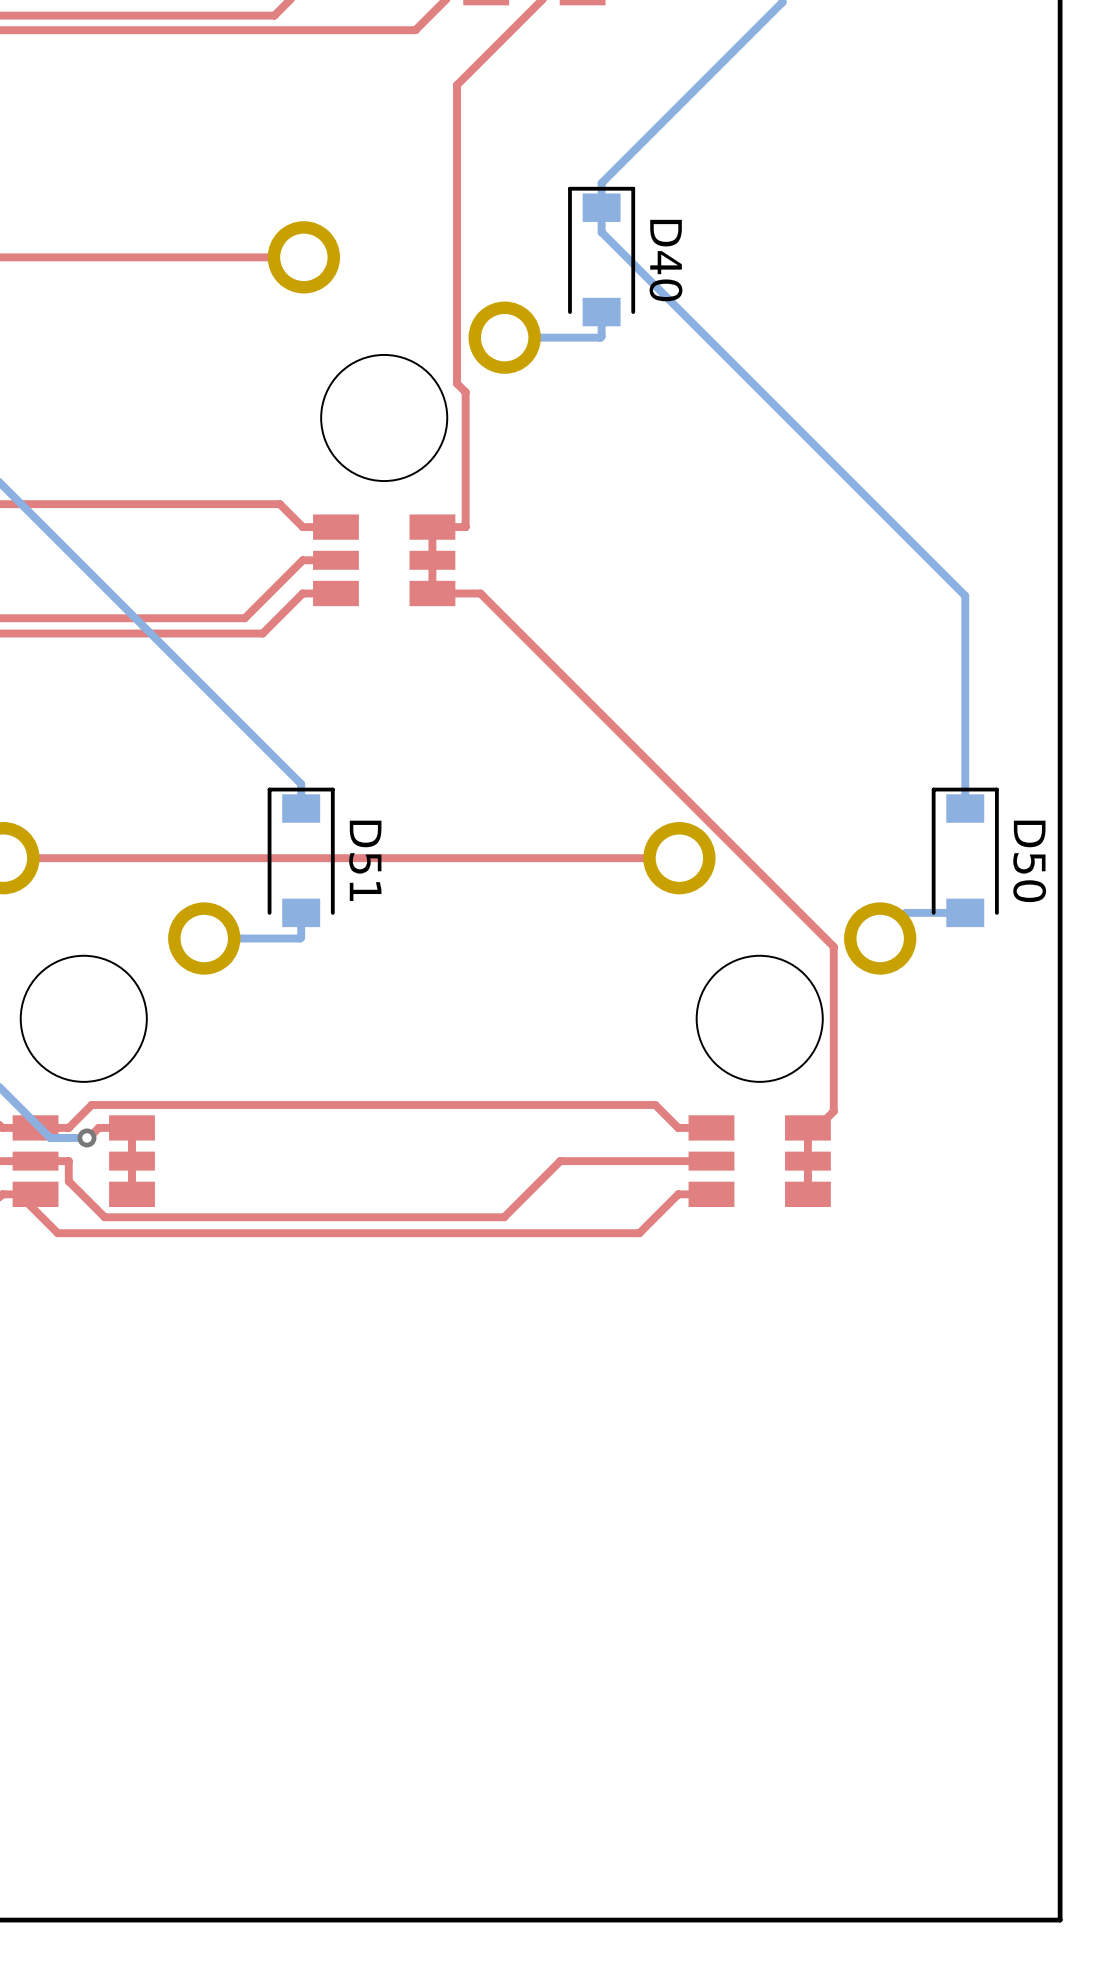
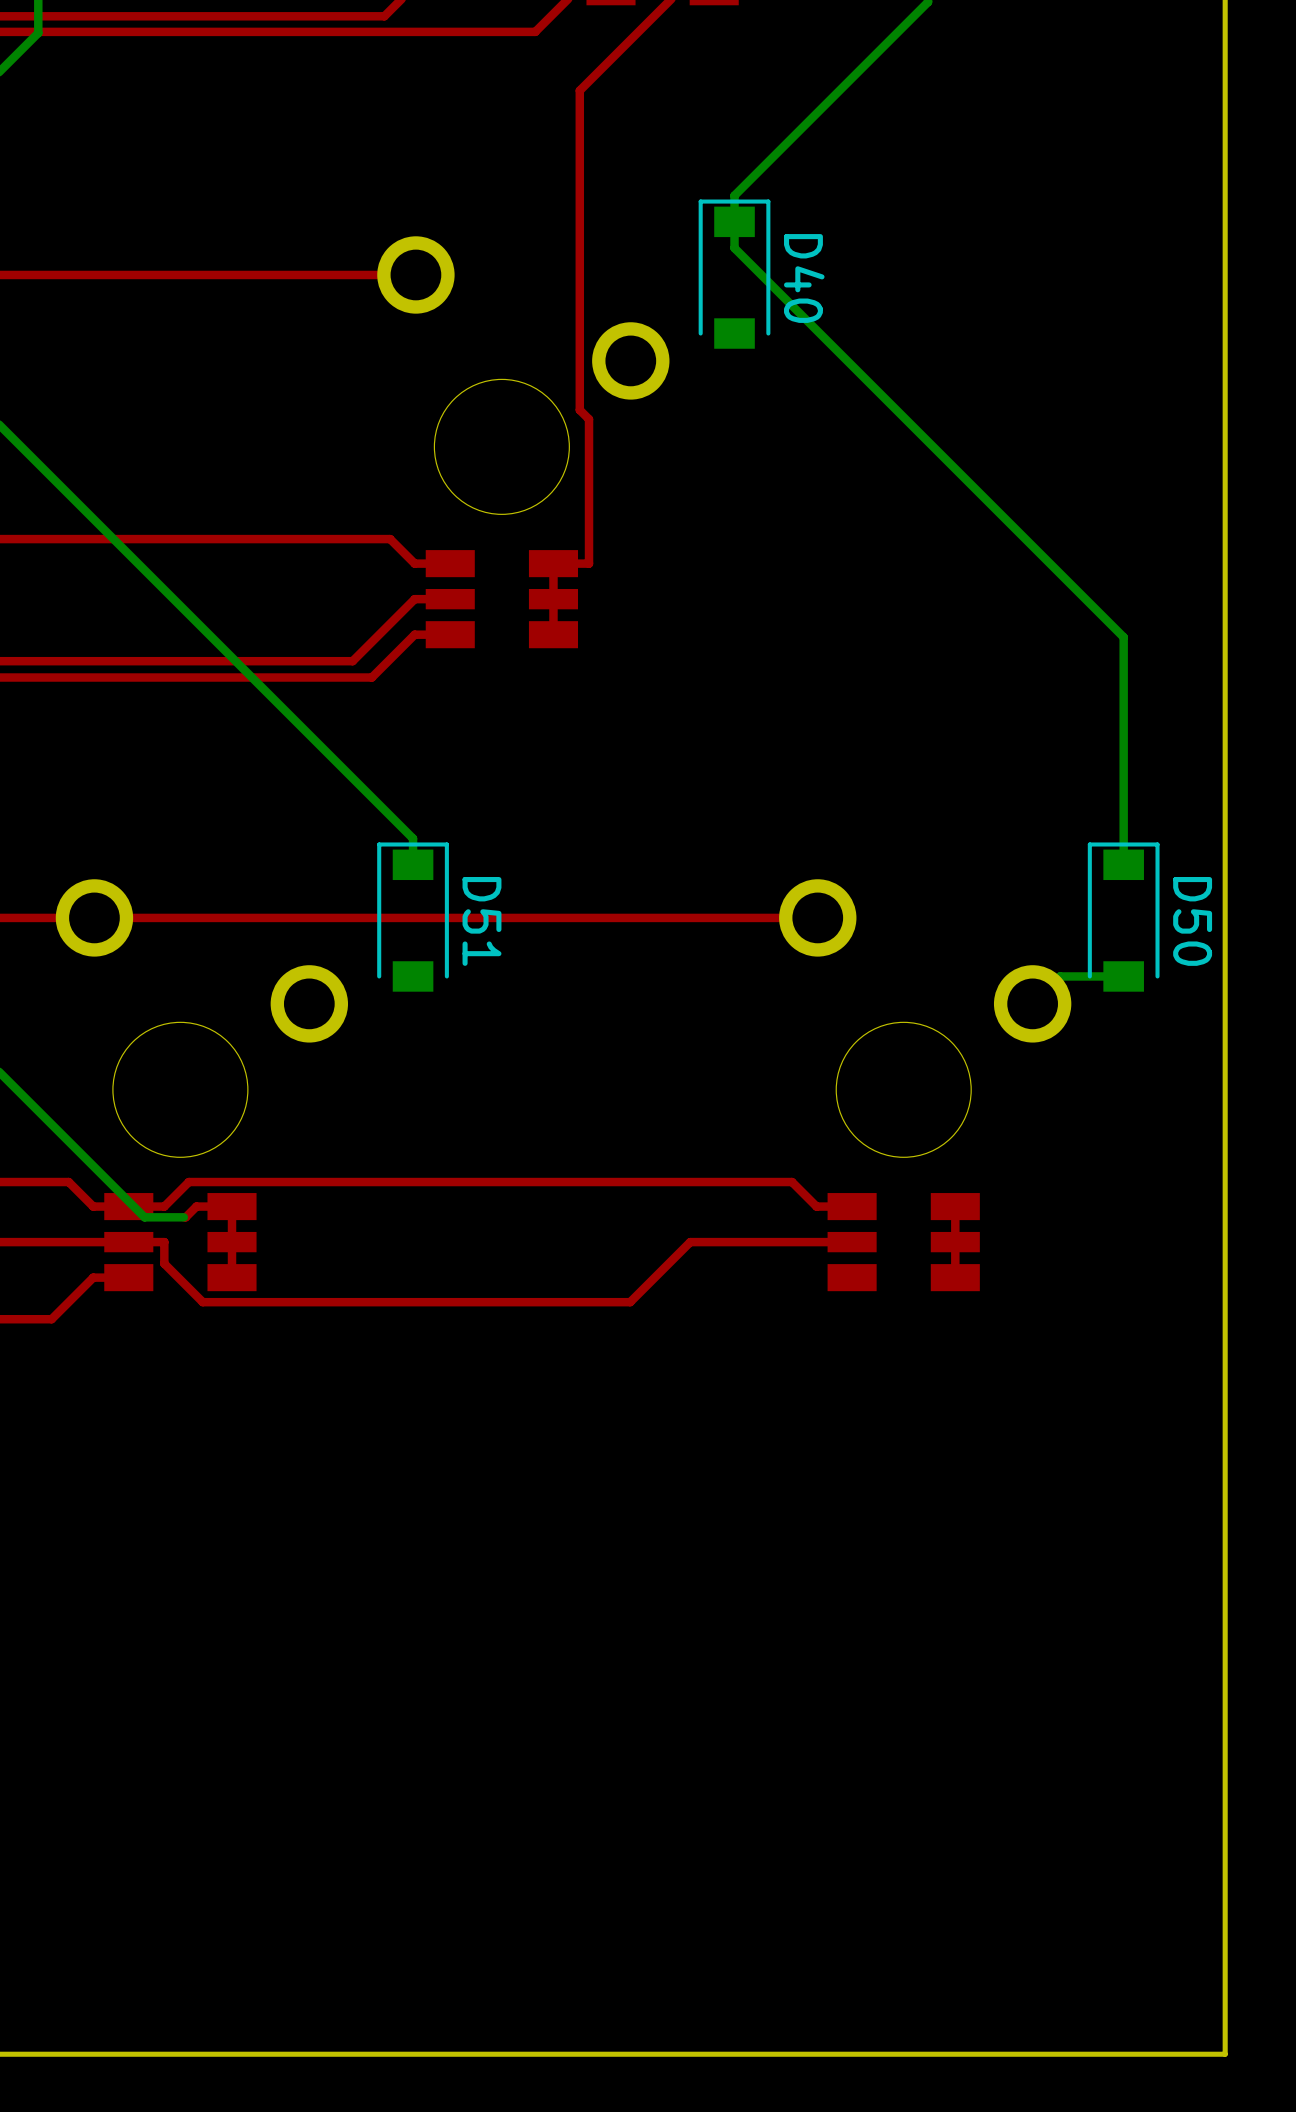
bottom track: (601, 312) (600, 337) (504, 337) -> none
top track: (432, 593) (480, 593) (833, 946) (833, 1111) (807, 1137) -> none
bottom track: (301, 912) (300, 938) (204, 938) -> none
via: (86, 1137) -> none
top track: (711, 1194) (678, 1194) (639, 1233) (57, 1233) (18, 1194) -> none

